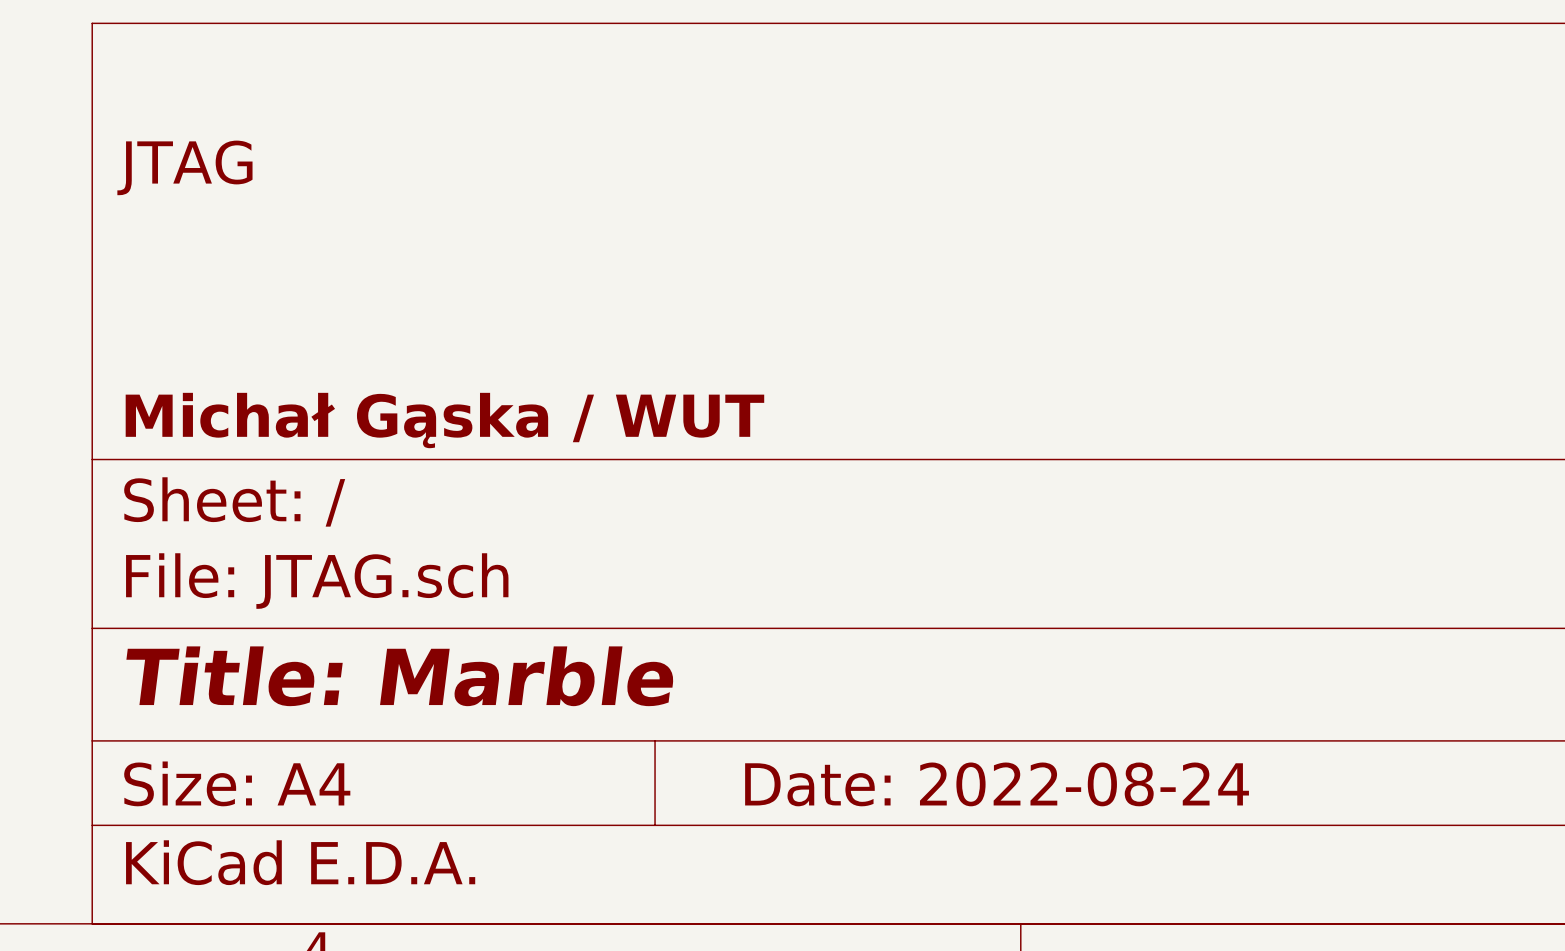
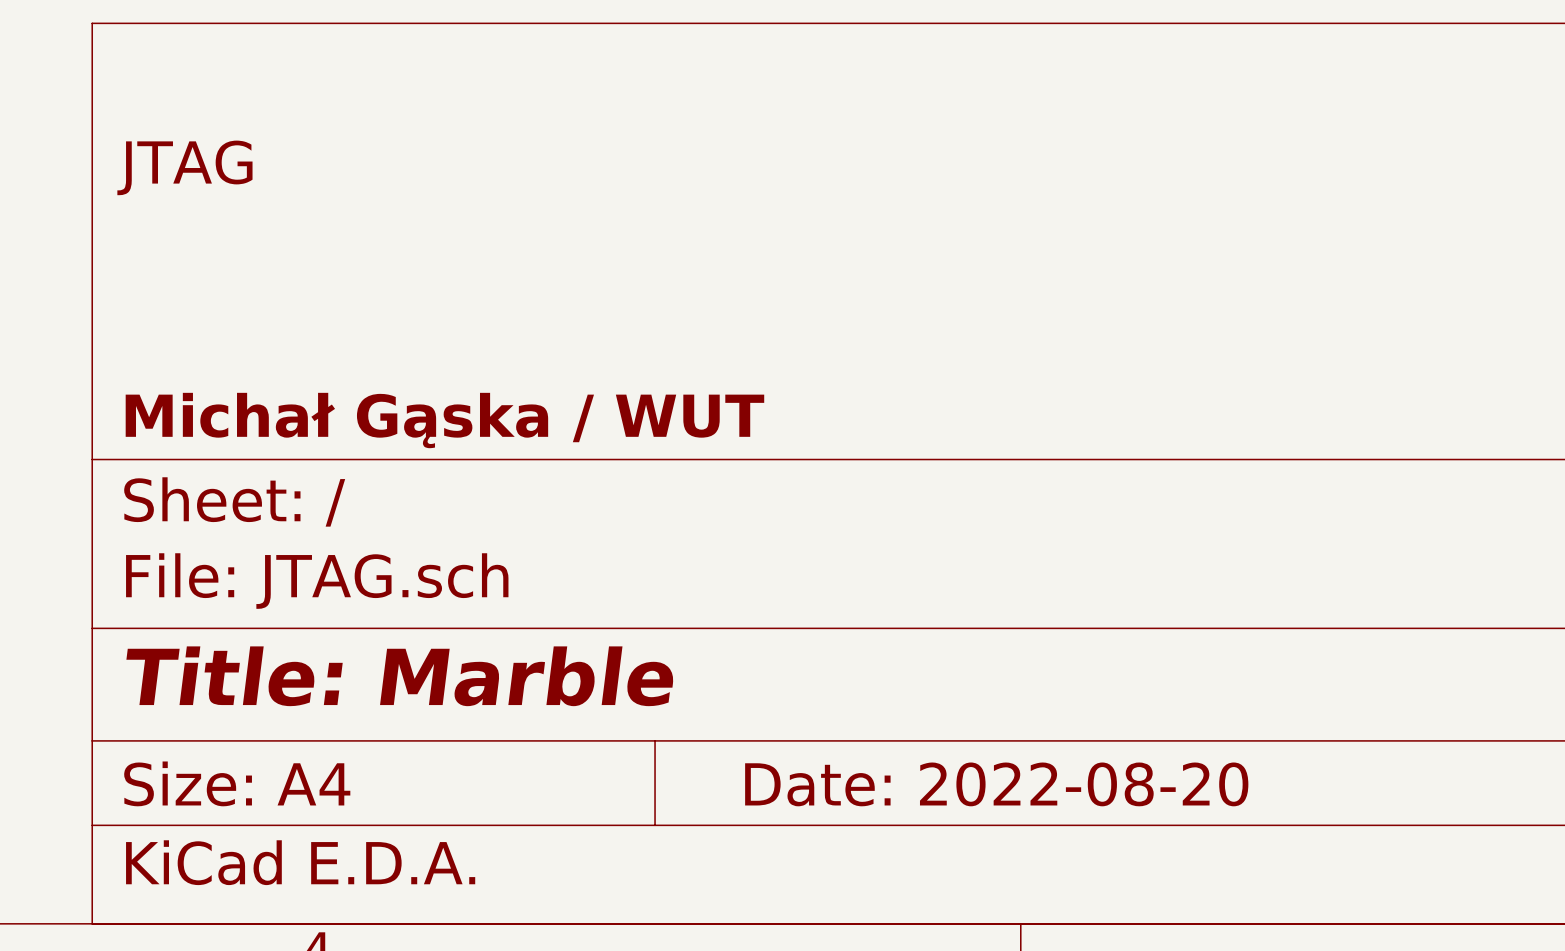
title block: Date: 2022-08-24 (997, 784) -> Date: 2022-08-20 (996, 784)

